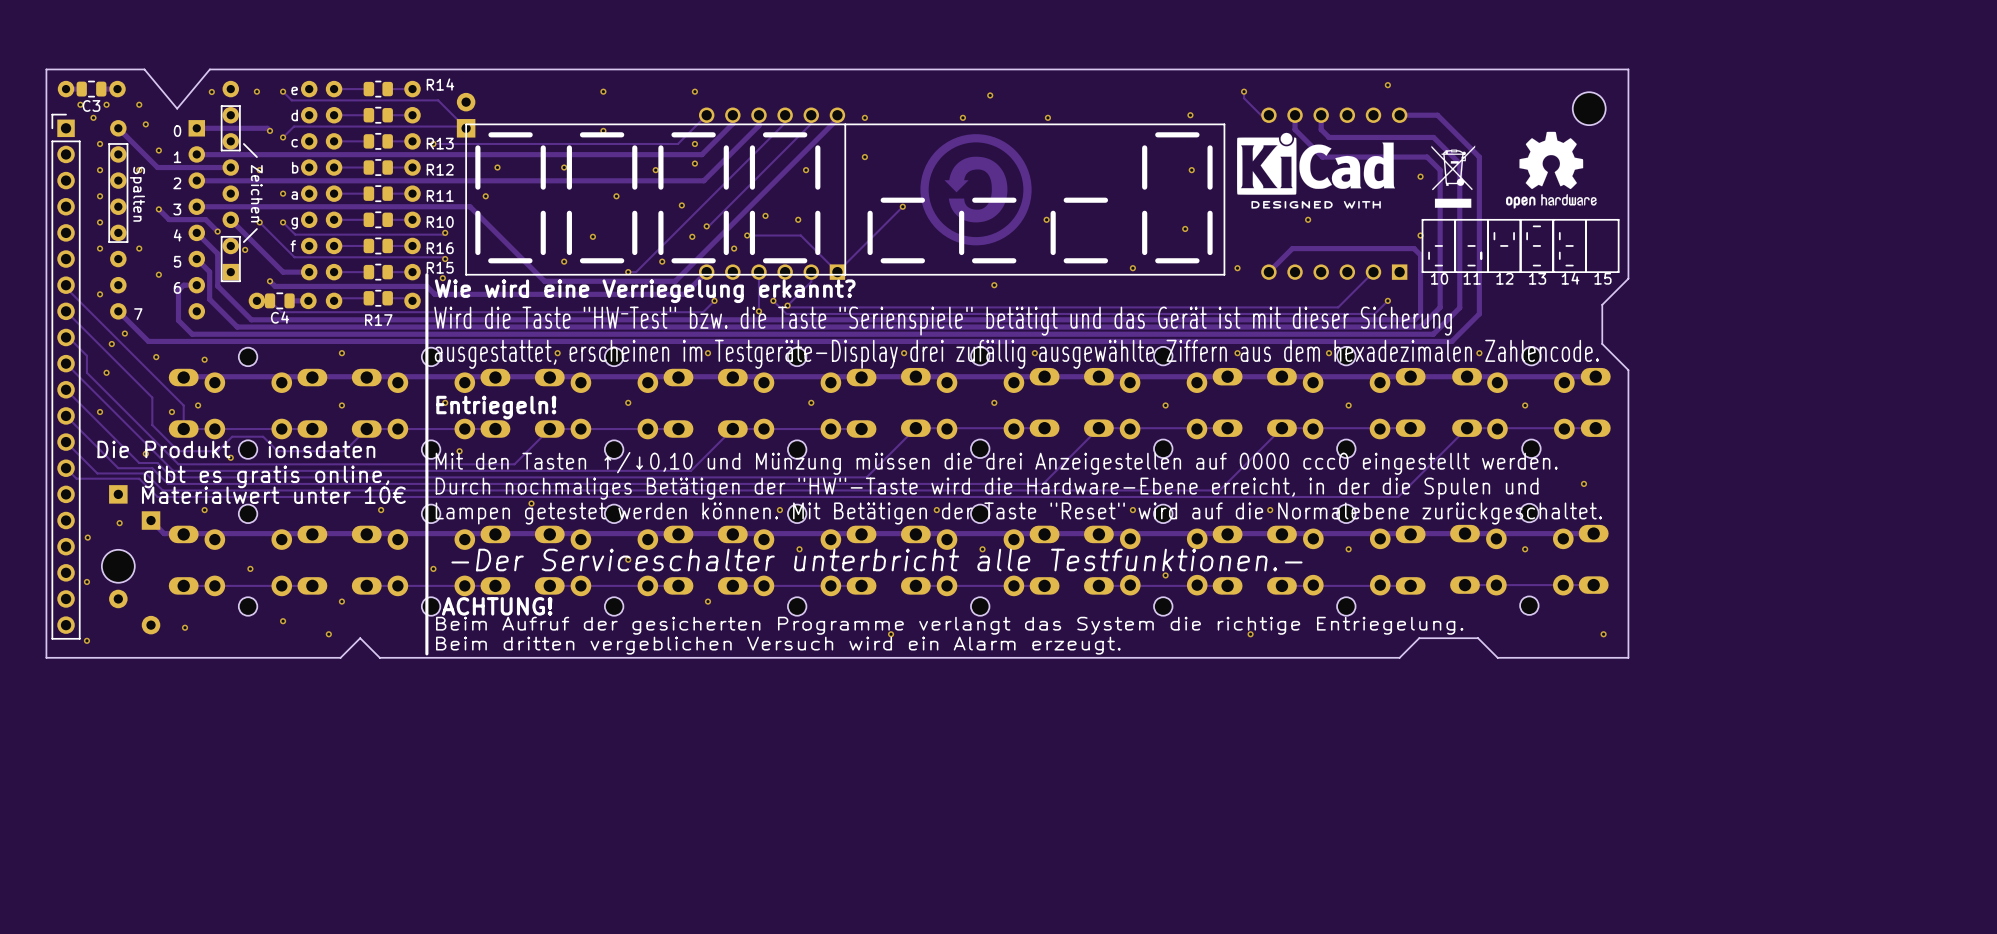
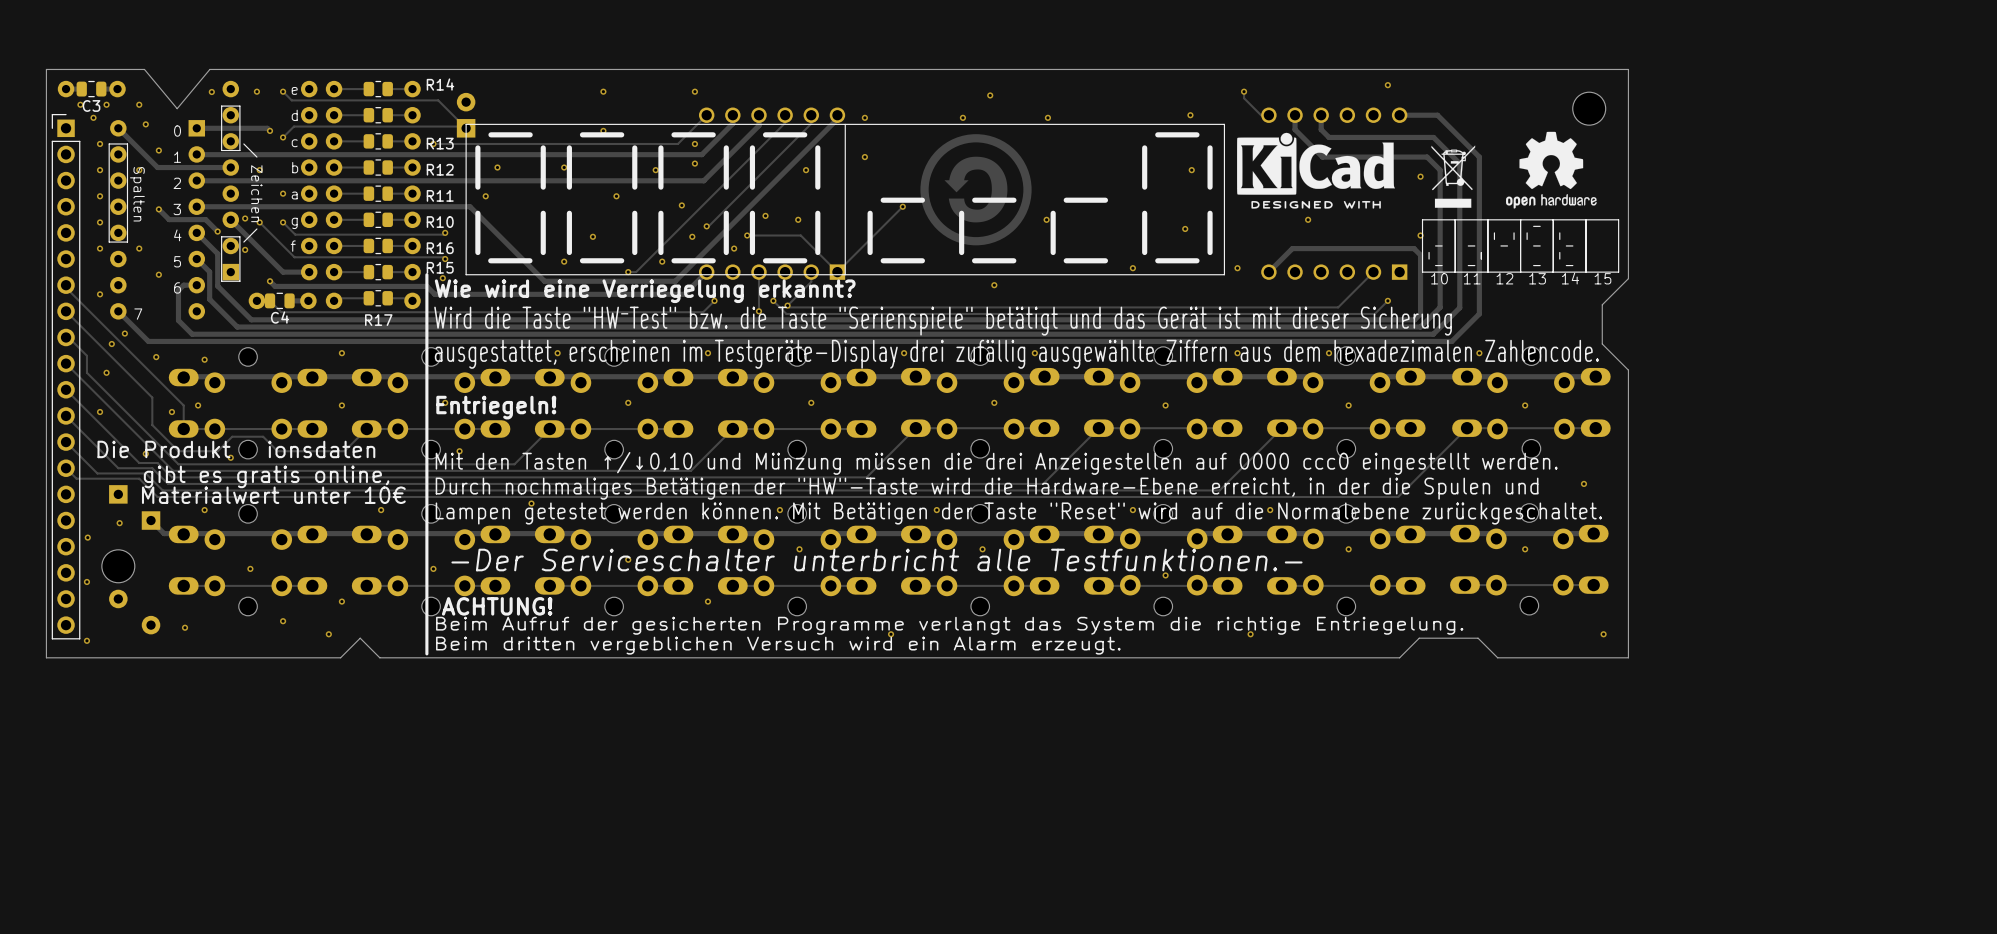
via: none -> (245, 218)

